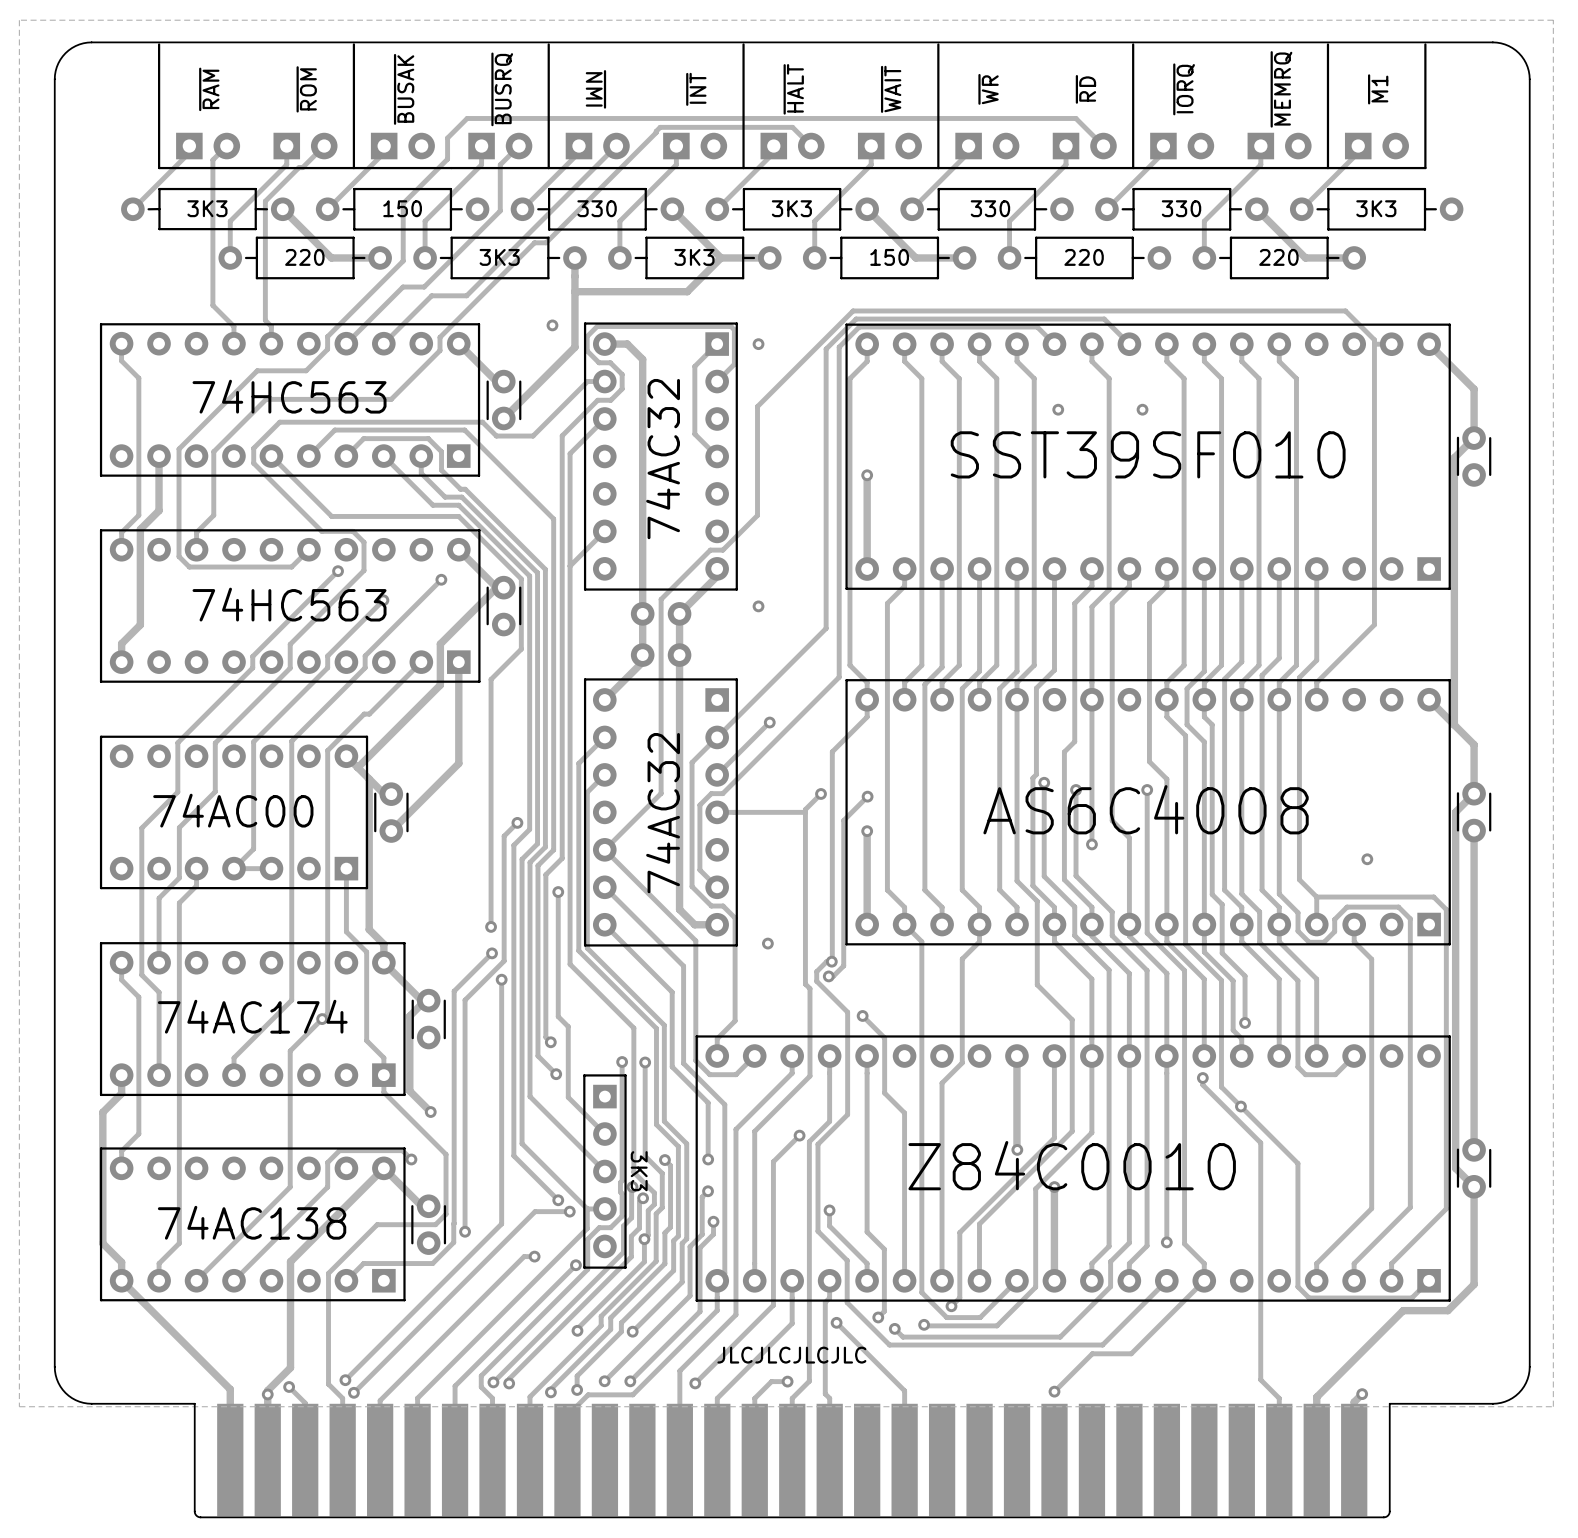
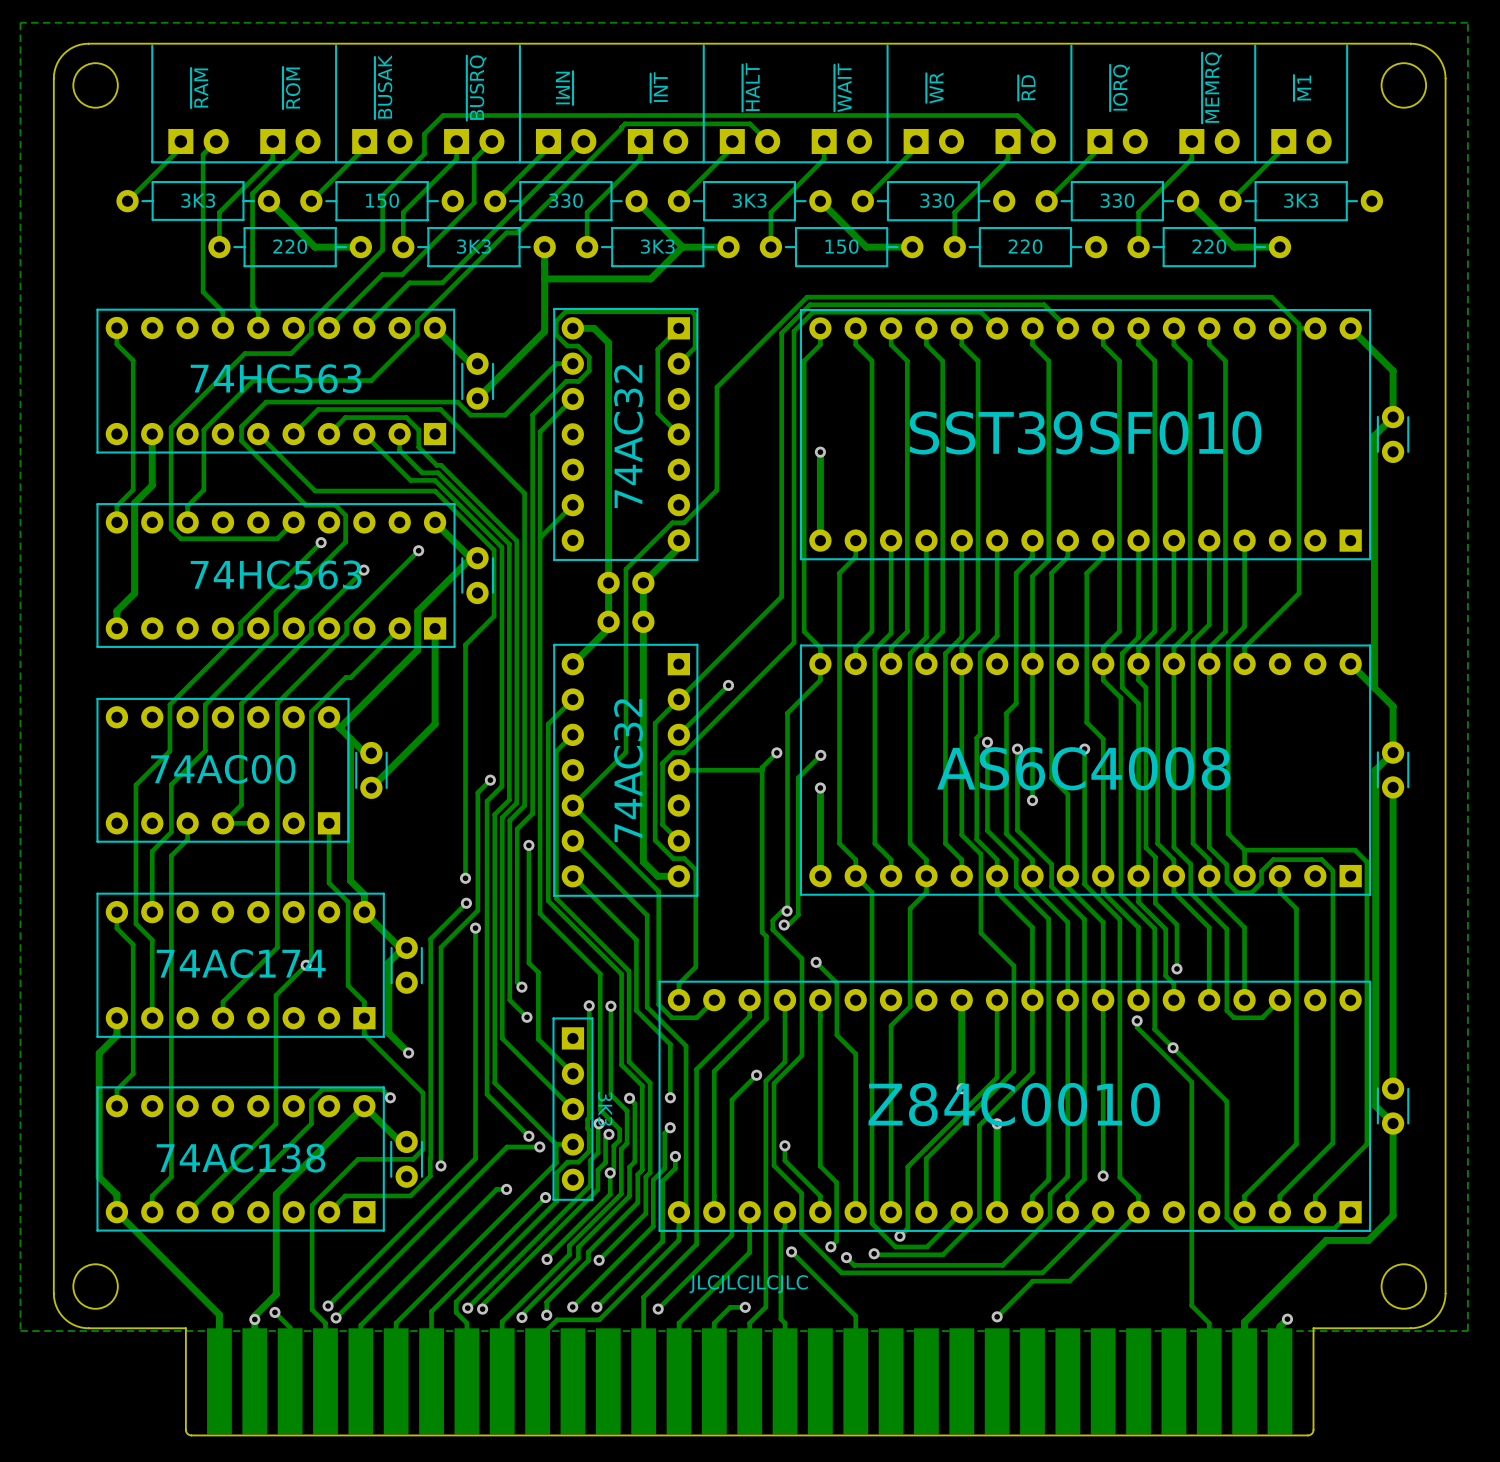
part footprint: [53, 41, 1531, 1519] -> [52, 42, 1447, 1437]
via: (552, 325) -> none
via: (758, 344) -> none
via: (1058, 409) -> none
via: (1142, 409) -> none
via: (758, 606) -> none
via: (1367, 859) -> none
via: (767, 943) -> none

